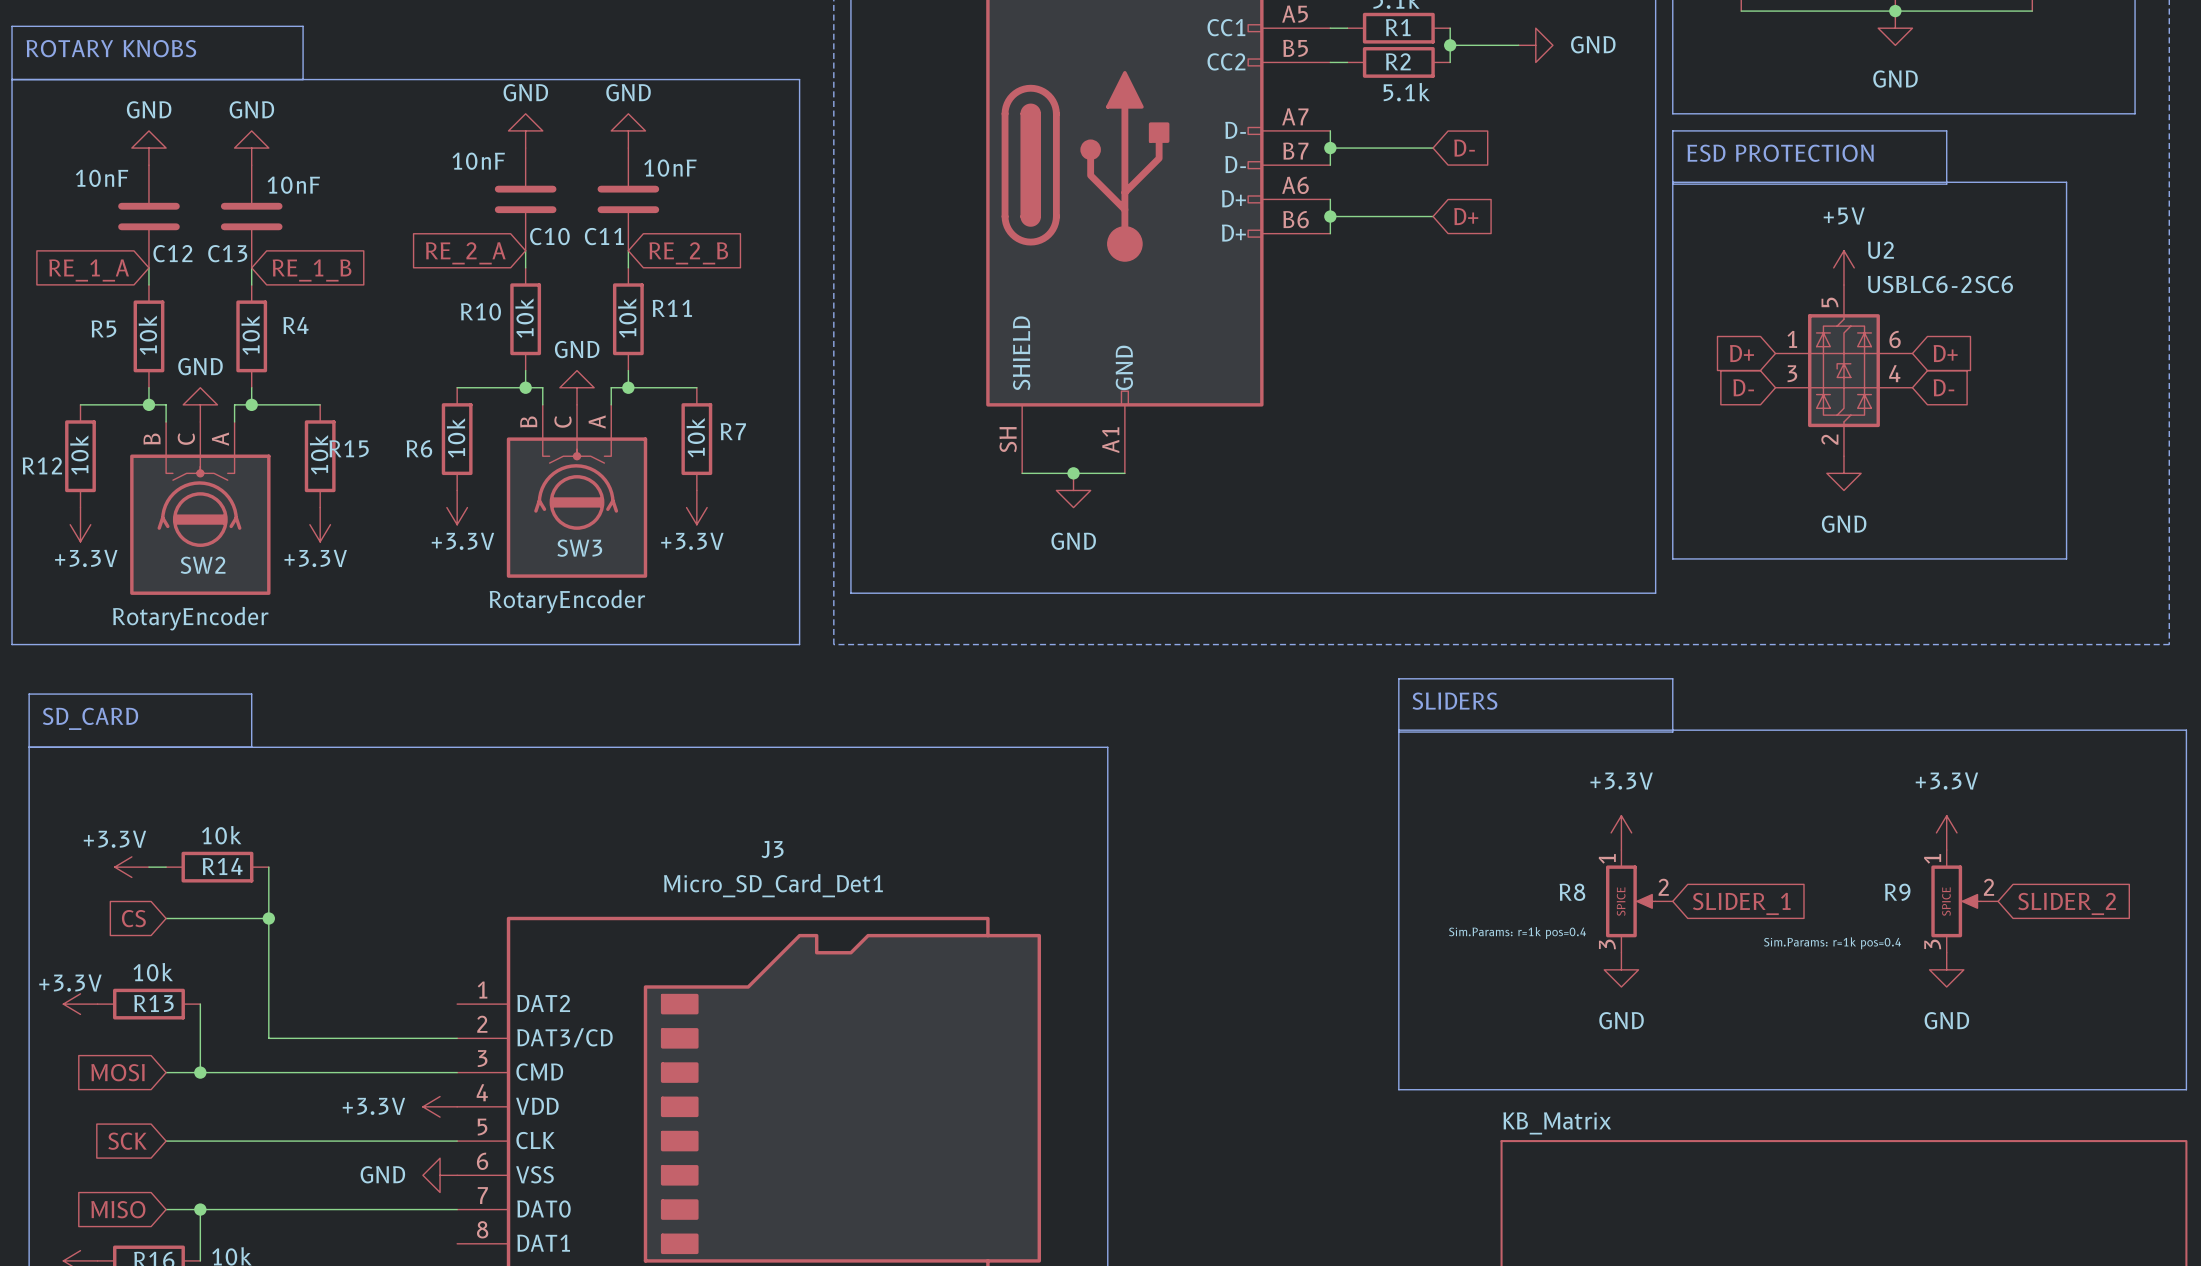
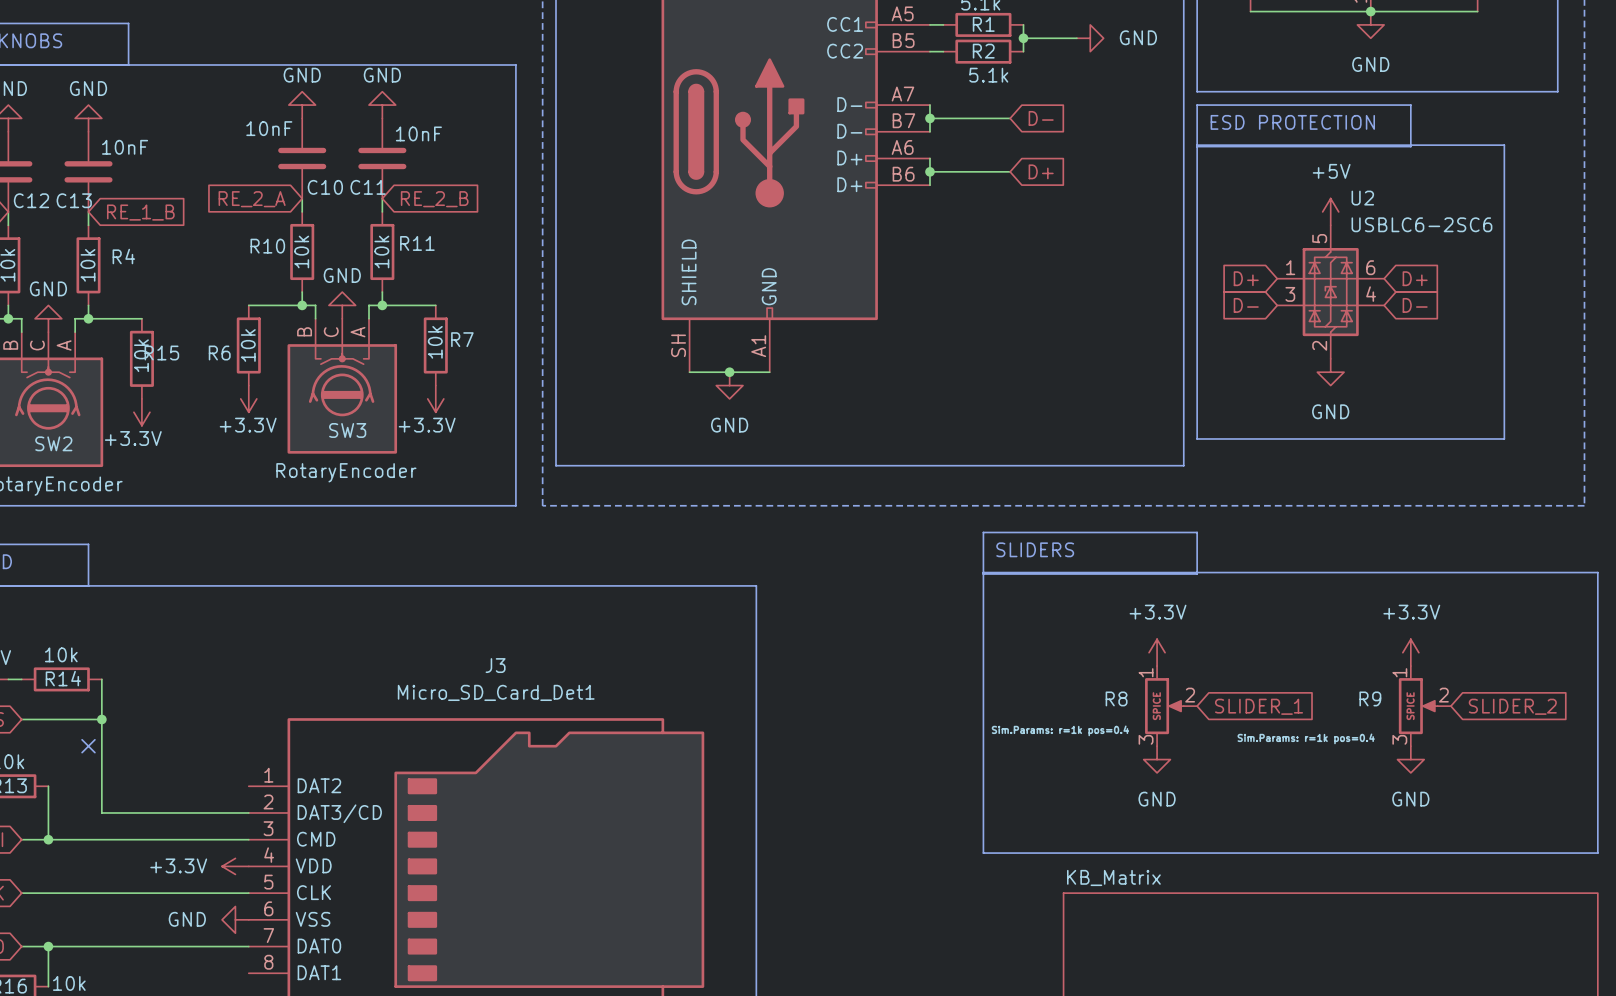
no-connect mark: none -> (88, 746)

